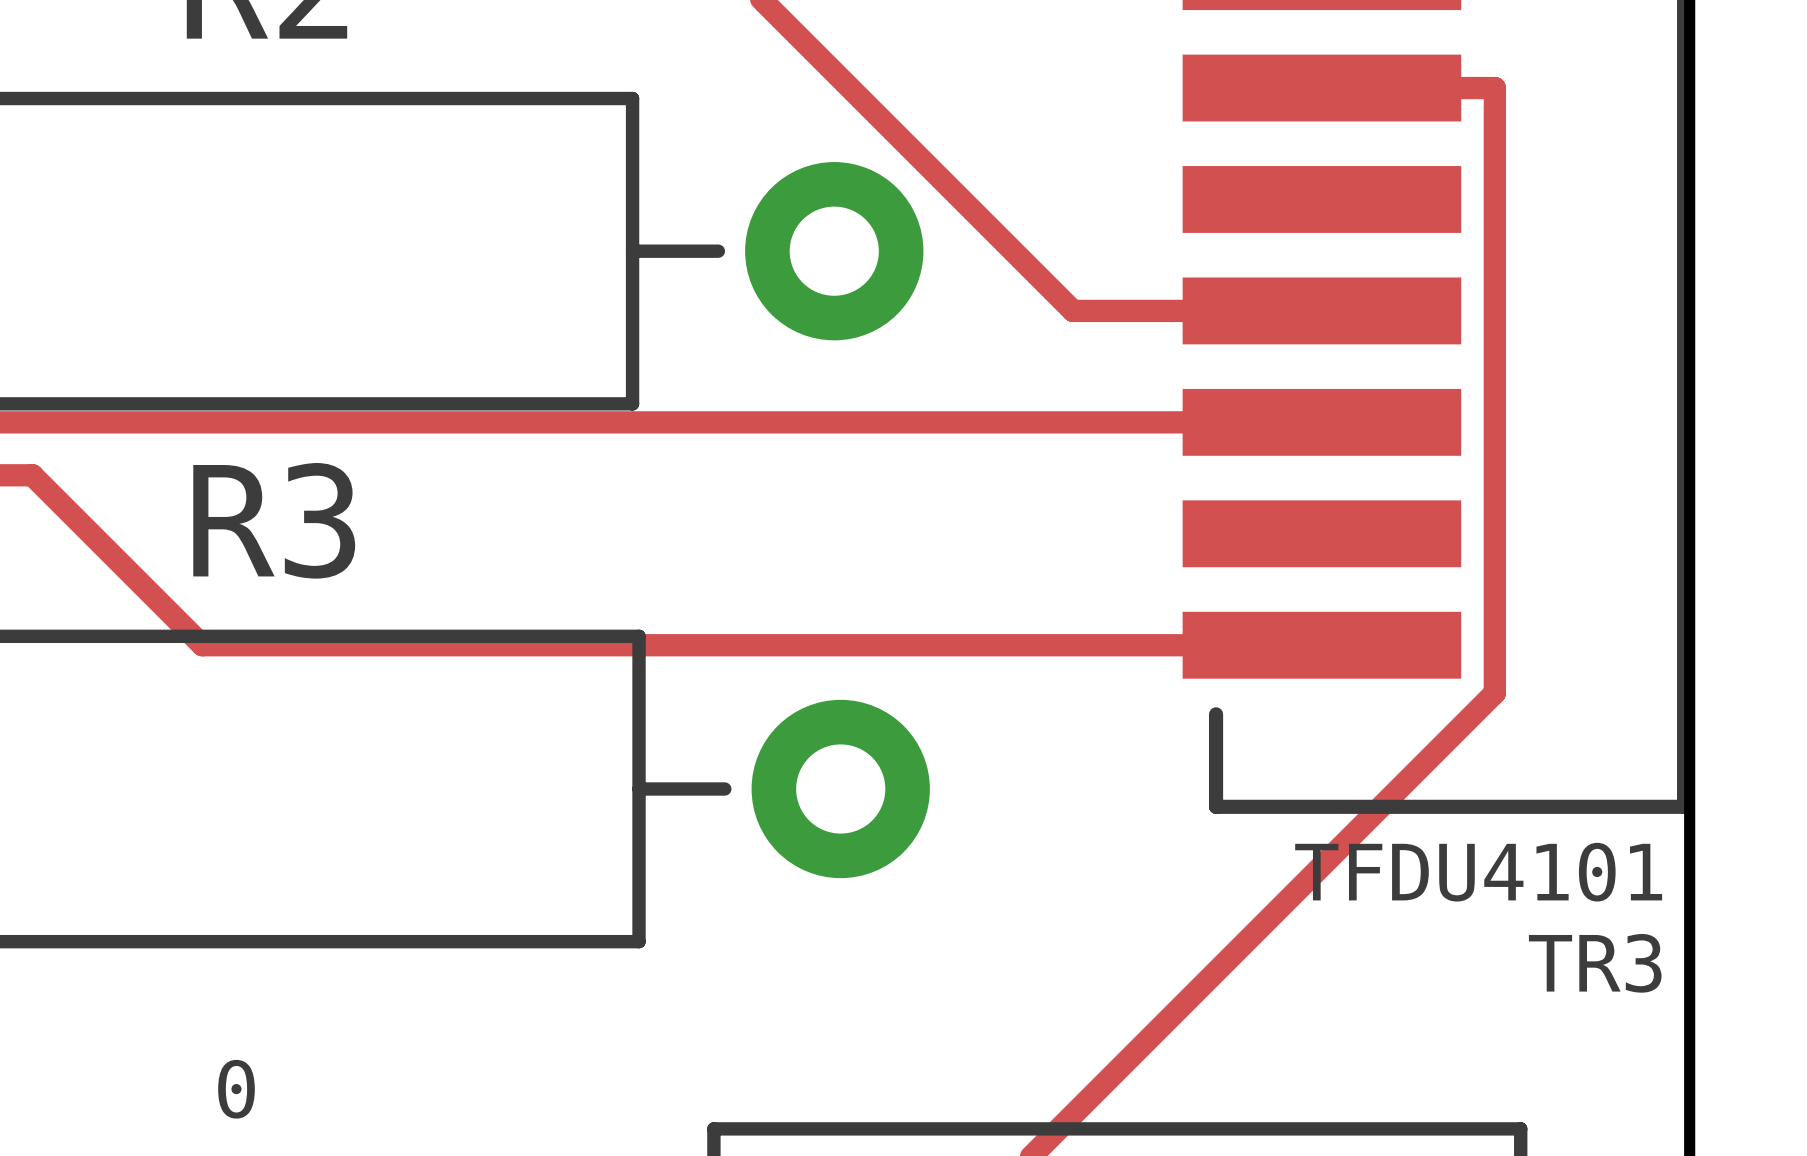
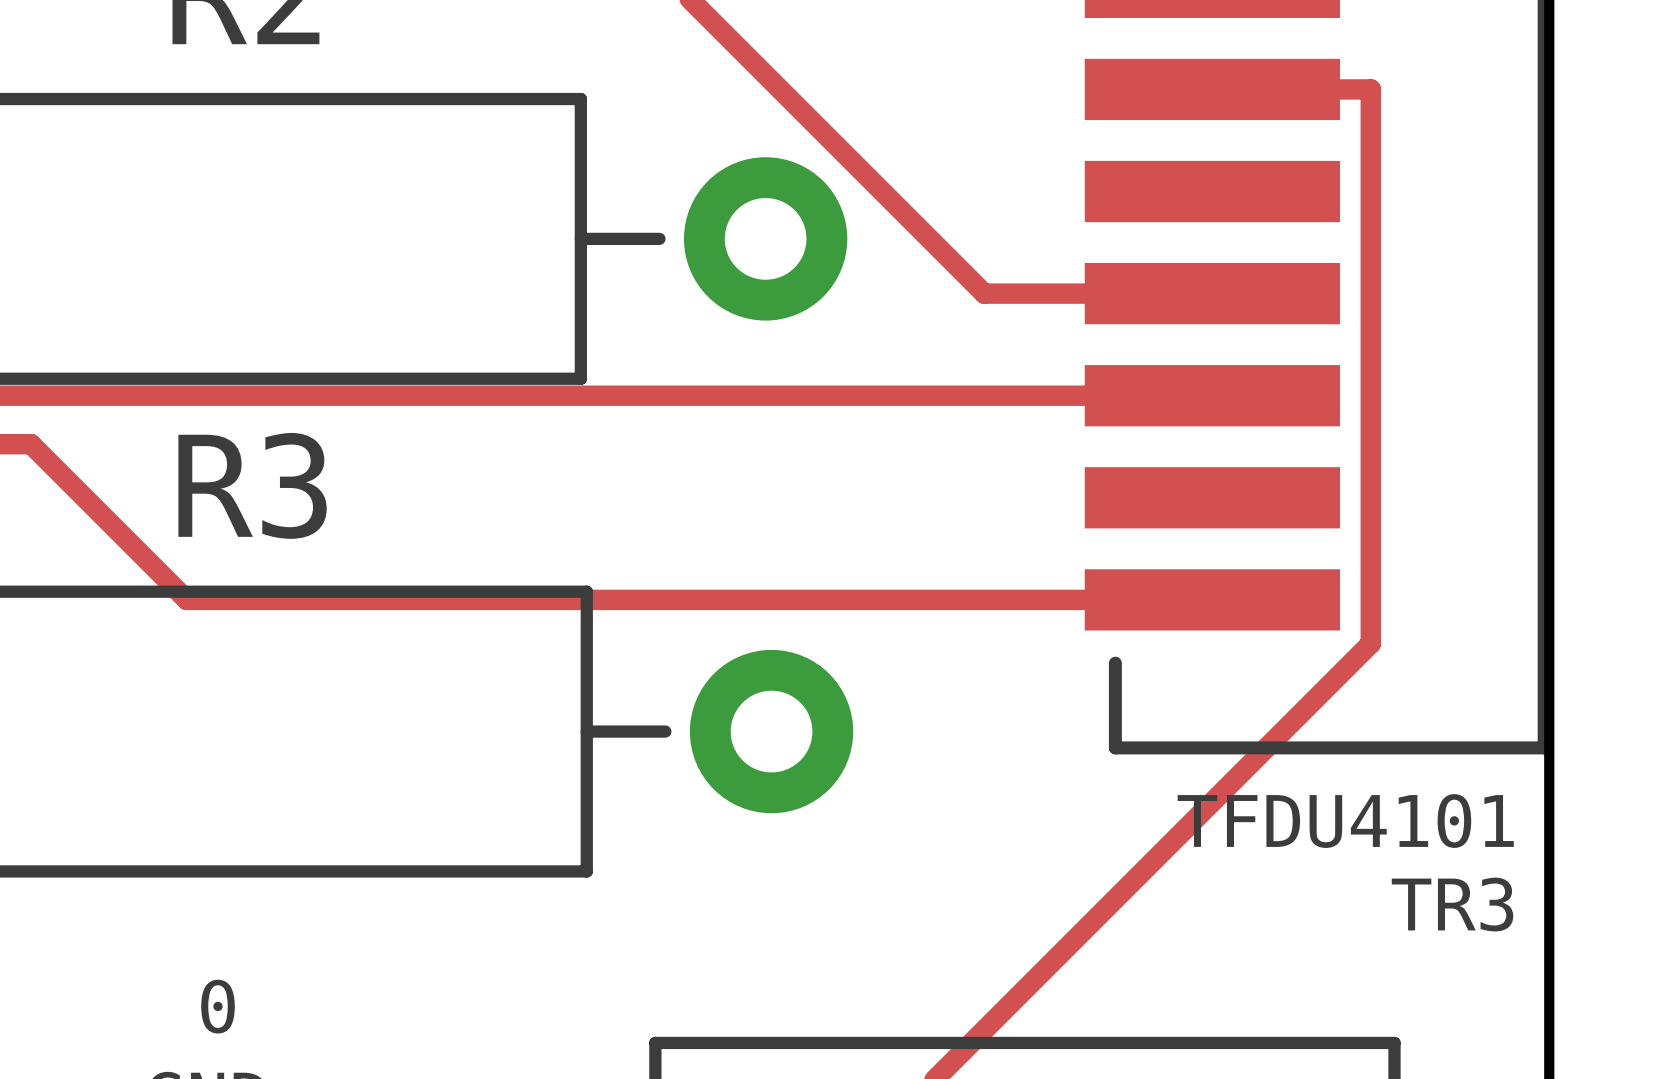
text position: TFDU4101 (1478, 872) -> TFDU4101 (1345, 821)
text position: TR3 (1595, 963) -> TR3 (1452, 904)

